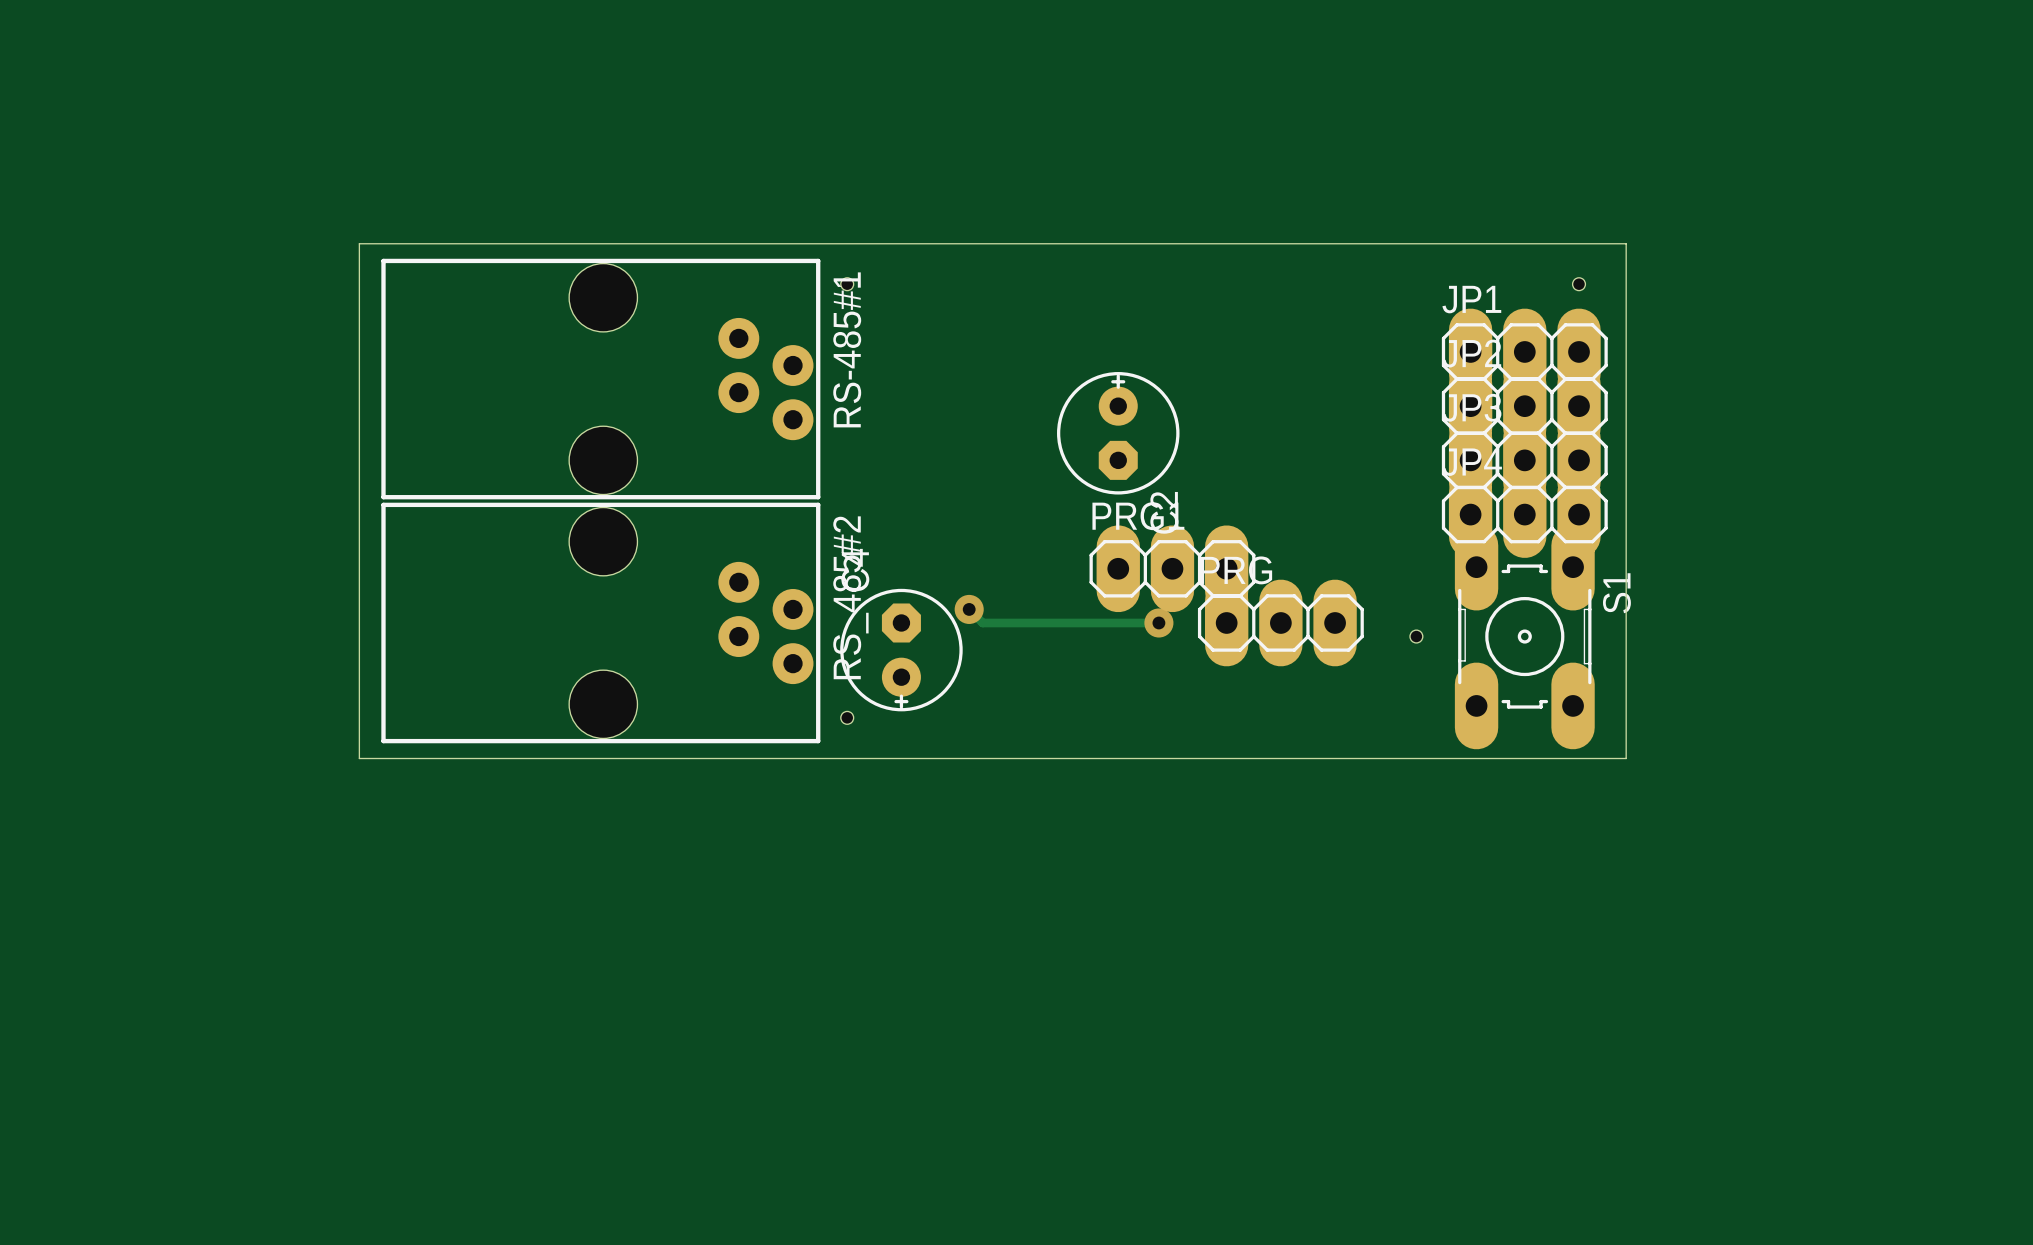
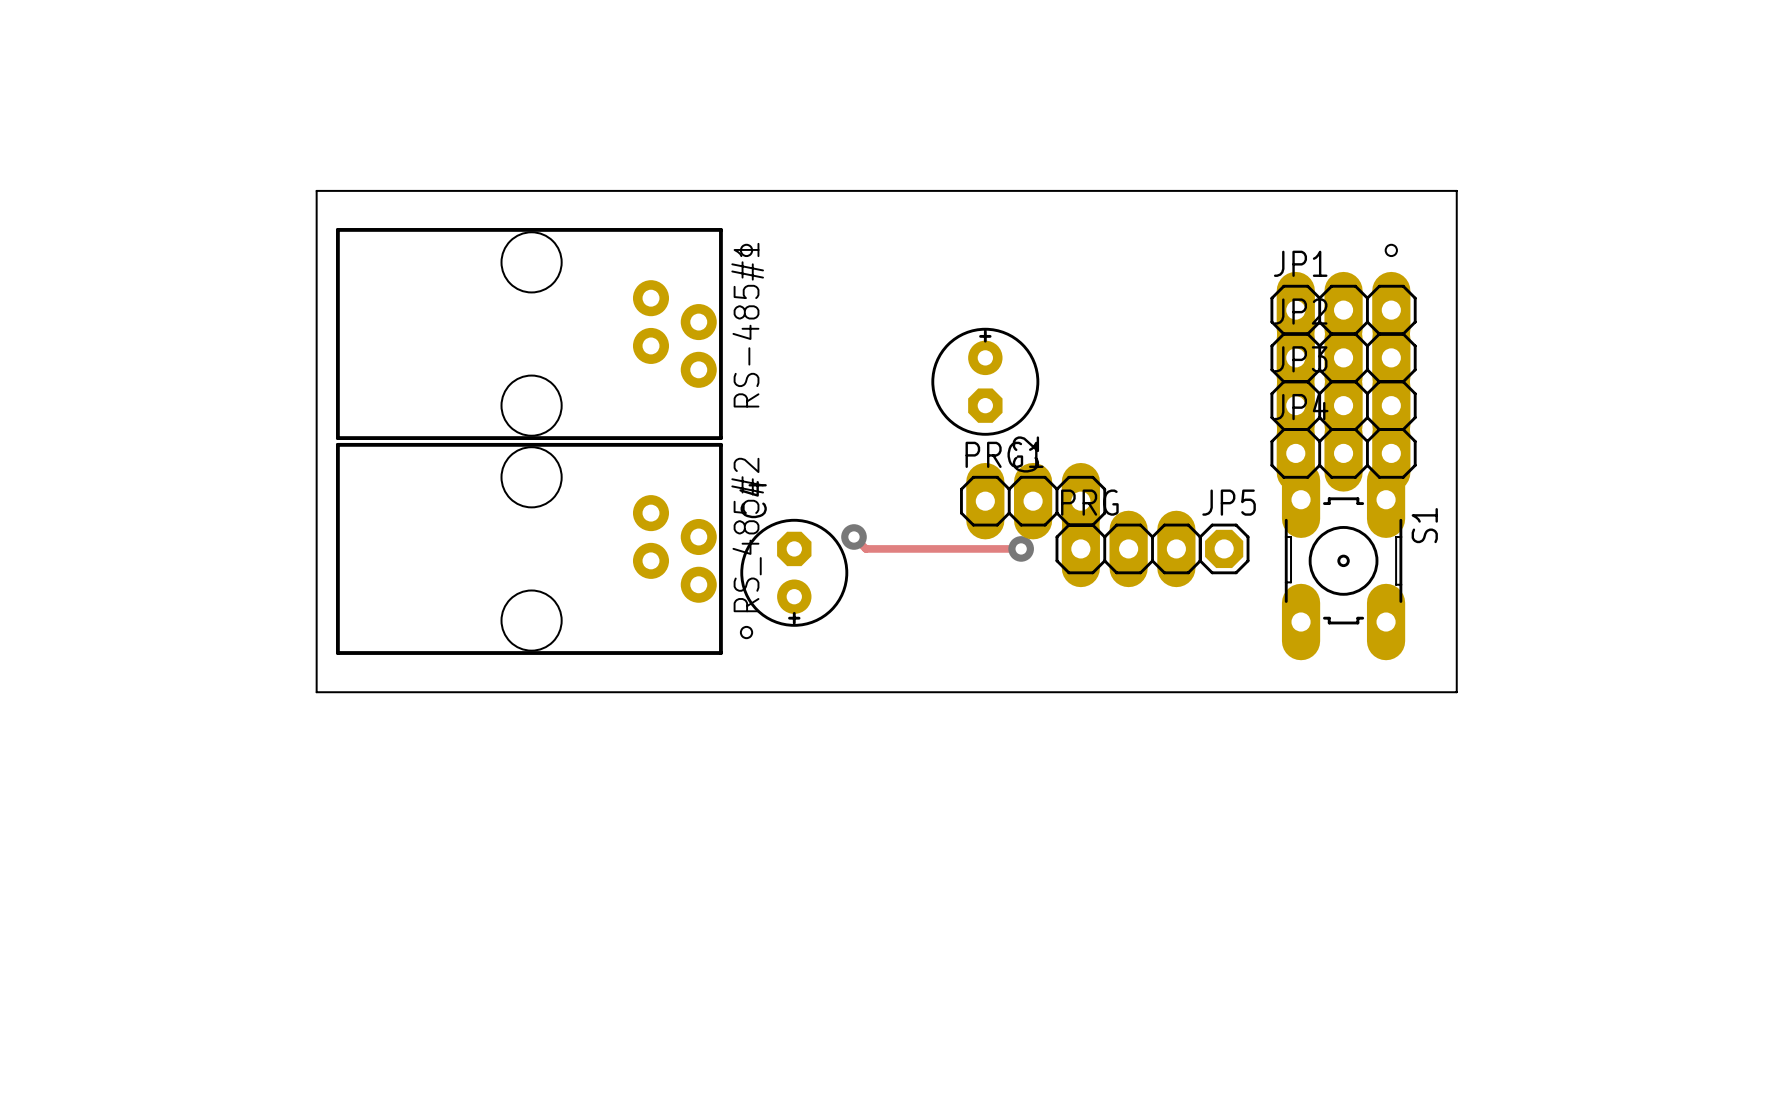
board edge: (359, 243) (1626, 243) (1626, 758) (359, 758) -> (316, 214) (316, 190) (1456, 190) (1456, 692) (316, 692) (316, 668)
JP5: none -> (1224, 548)
hole: (1416, 636) -> none

